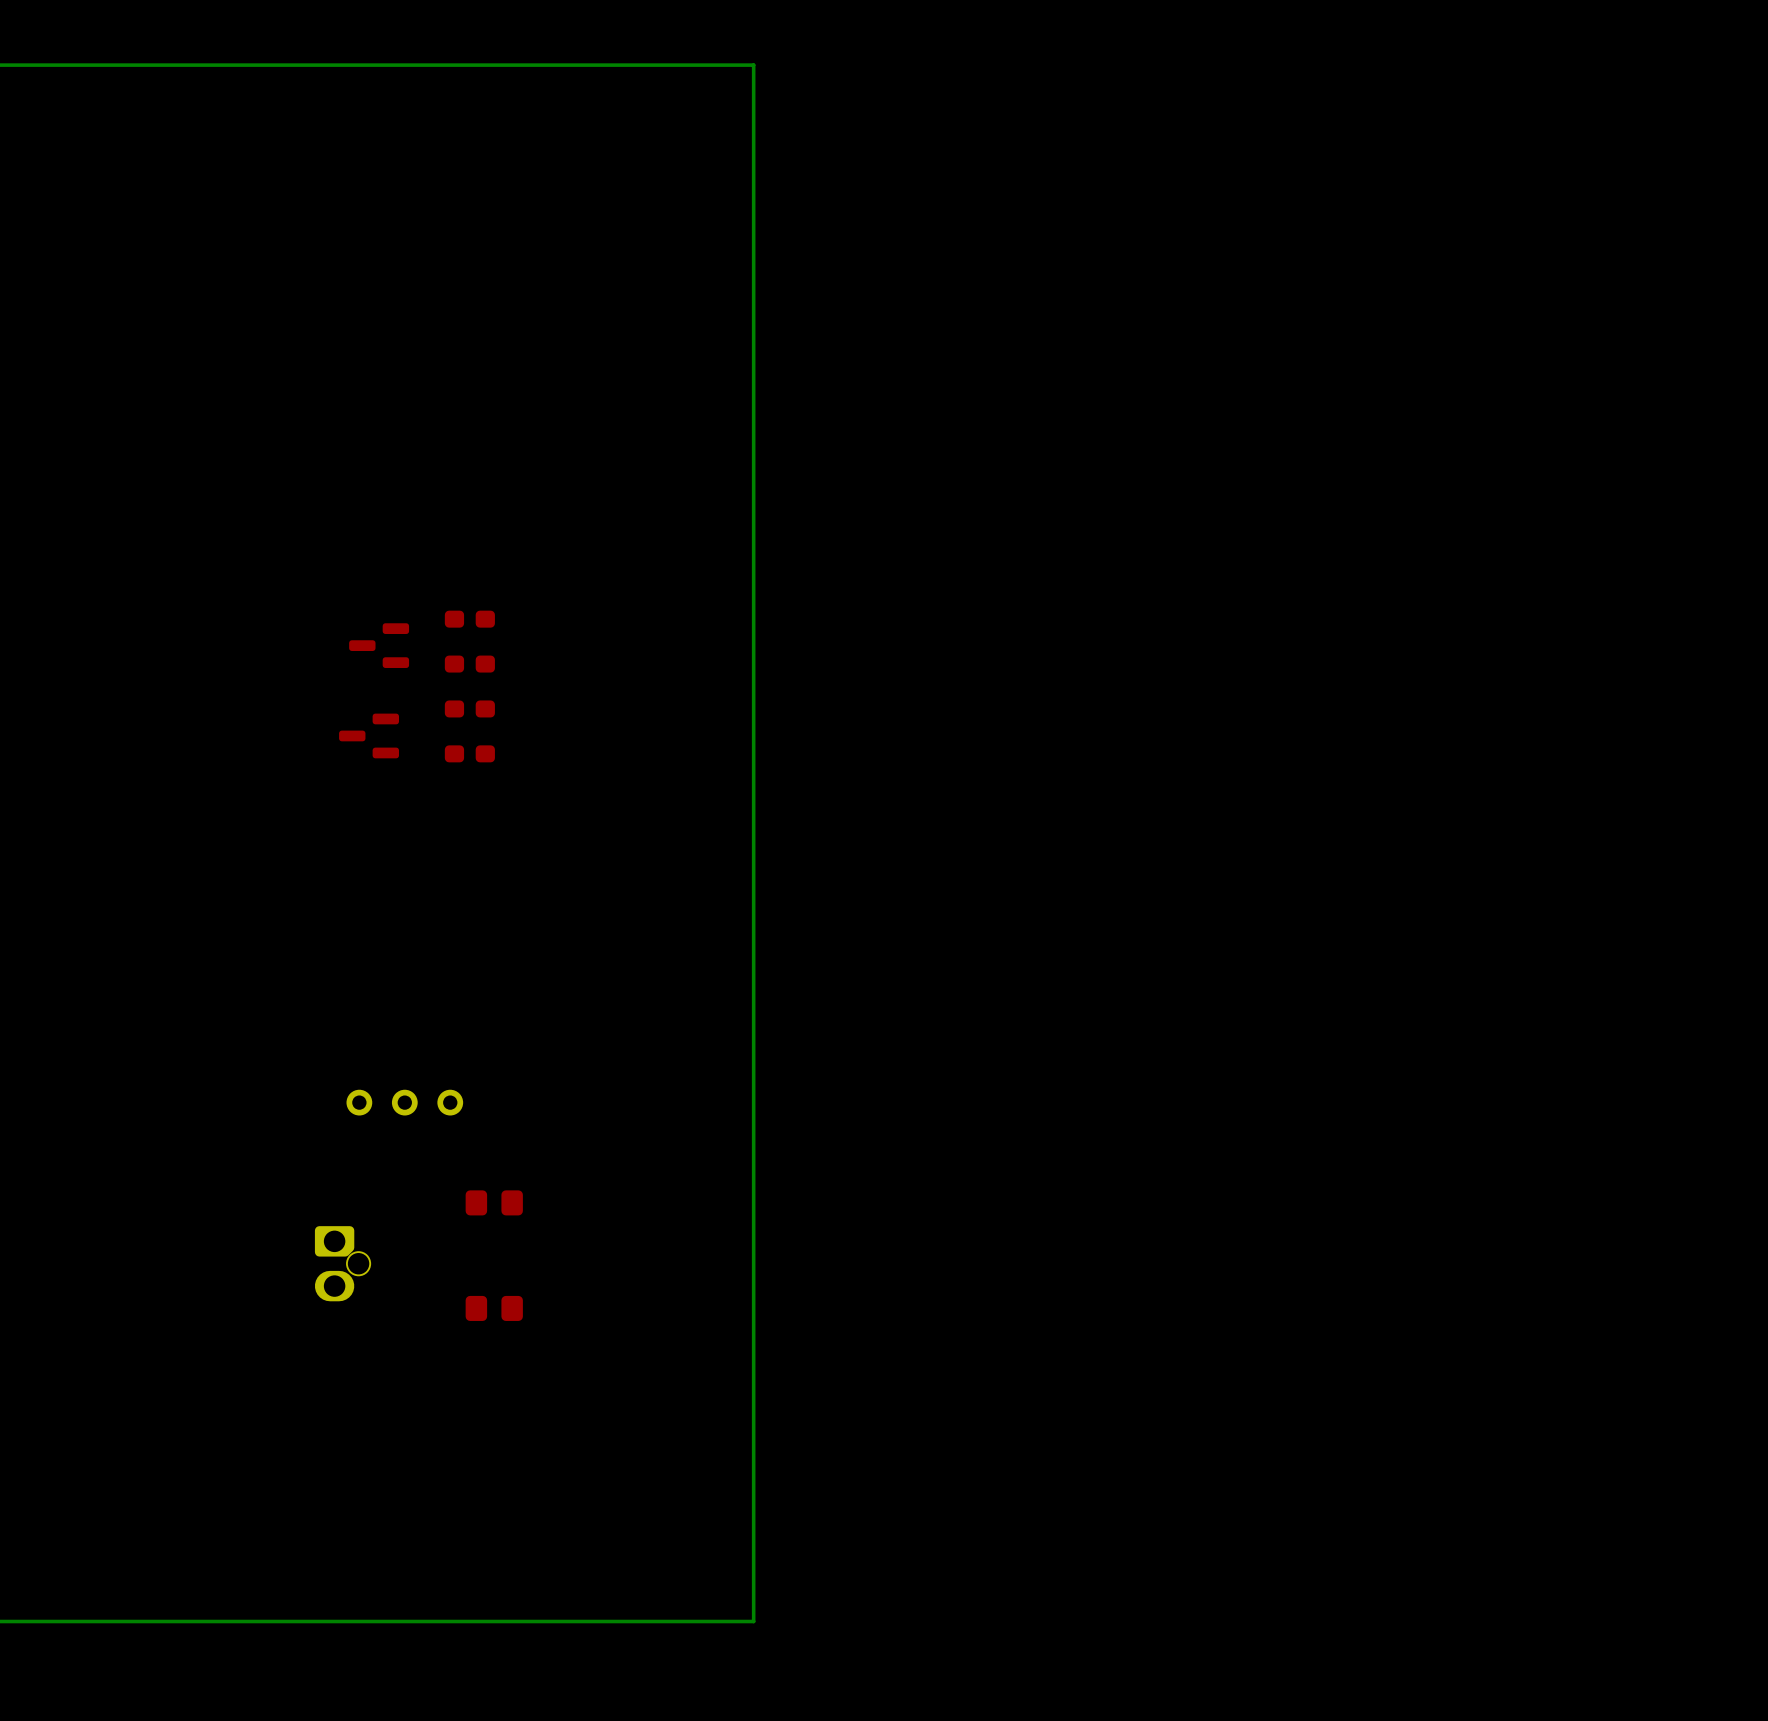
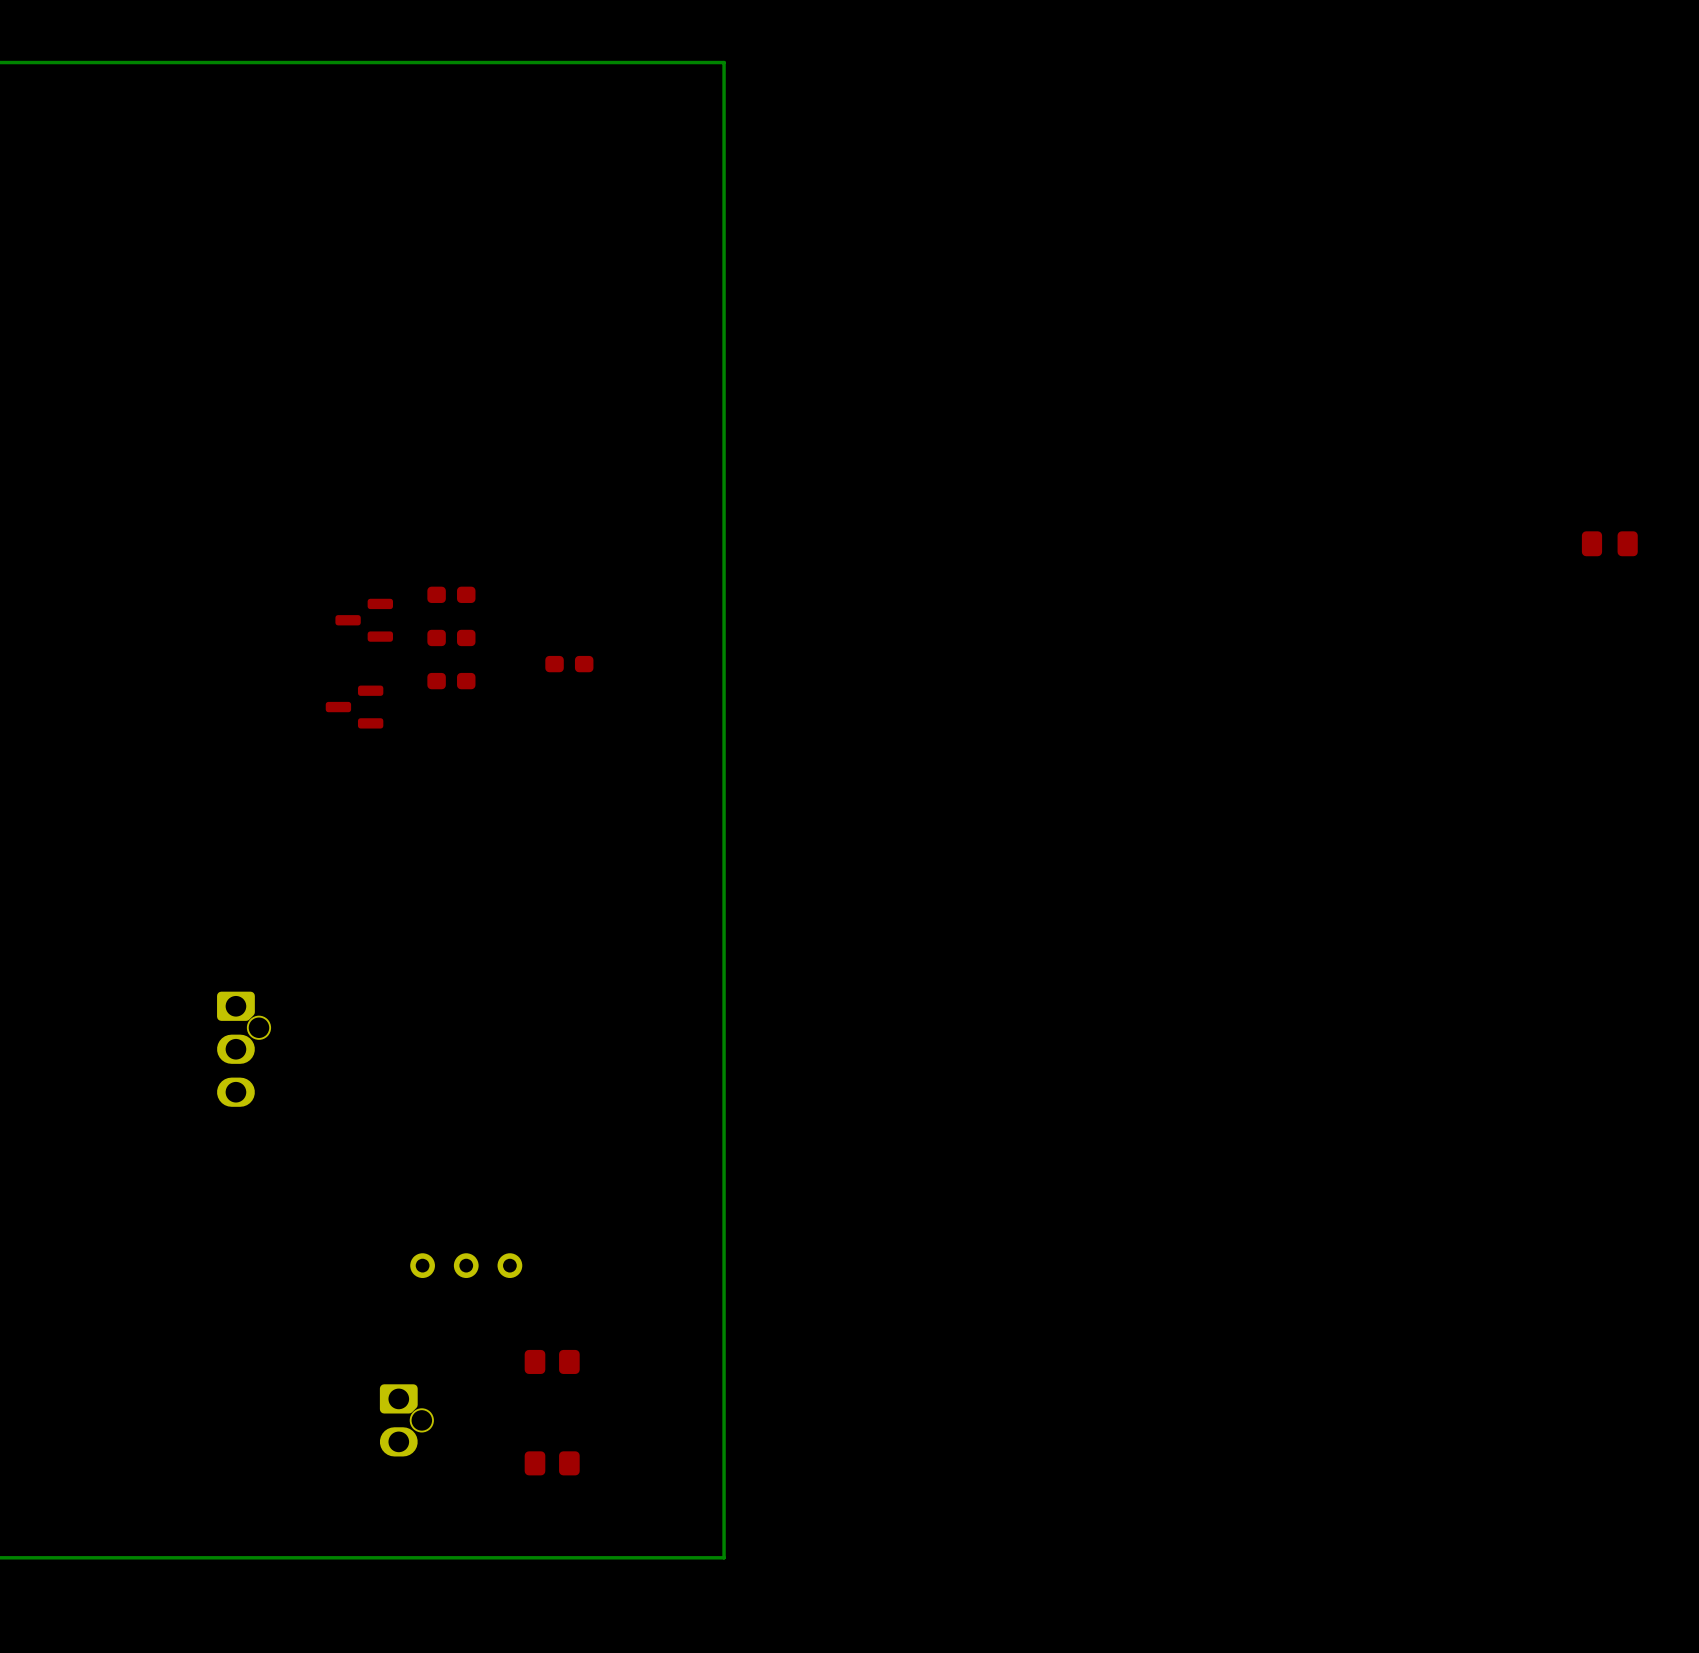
part: none -> (1609, 543)
part position: (469, 753) -> (569, 664)
part: none -> (243, 1049)
part: (404, 1102) -> none
part: (494, 1202) -> none
part position: (342, 1263) -> (406, 1420)
part footprint: [465, 1295, 523, 1321] -> [410, 1253, 523, 1279]
part: none -> (552, 1361)
part: none -> (552, 1463)

